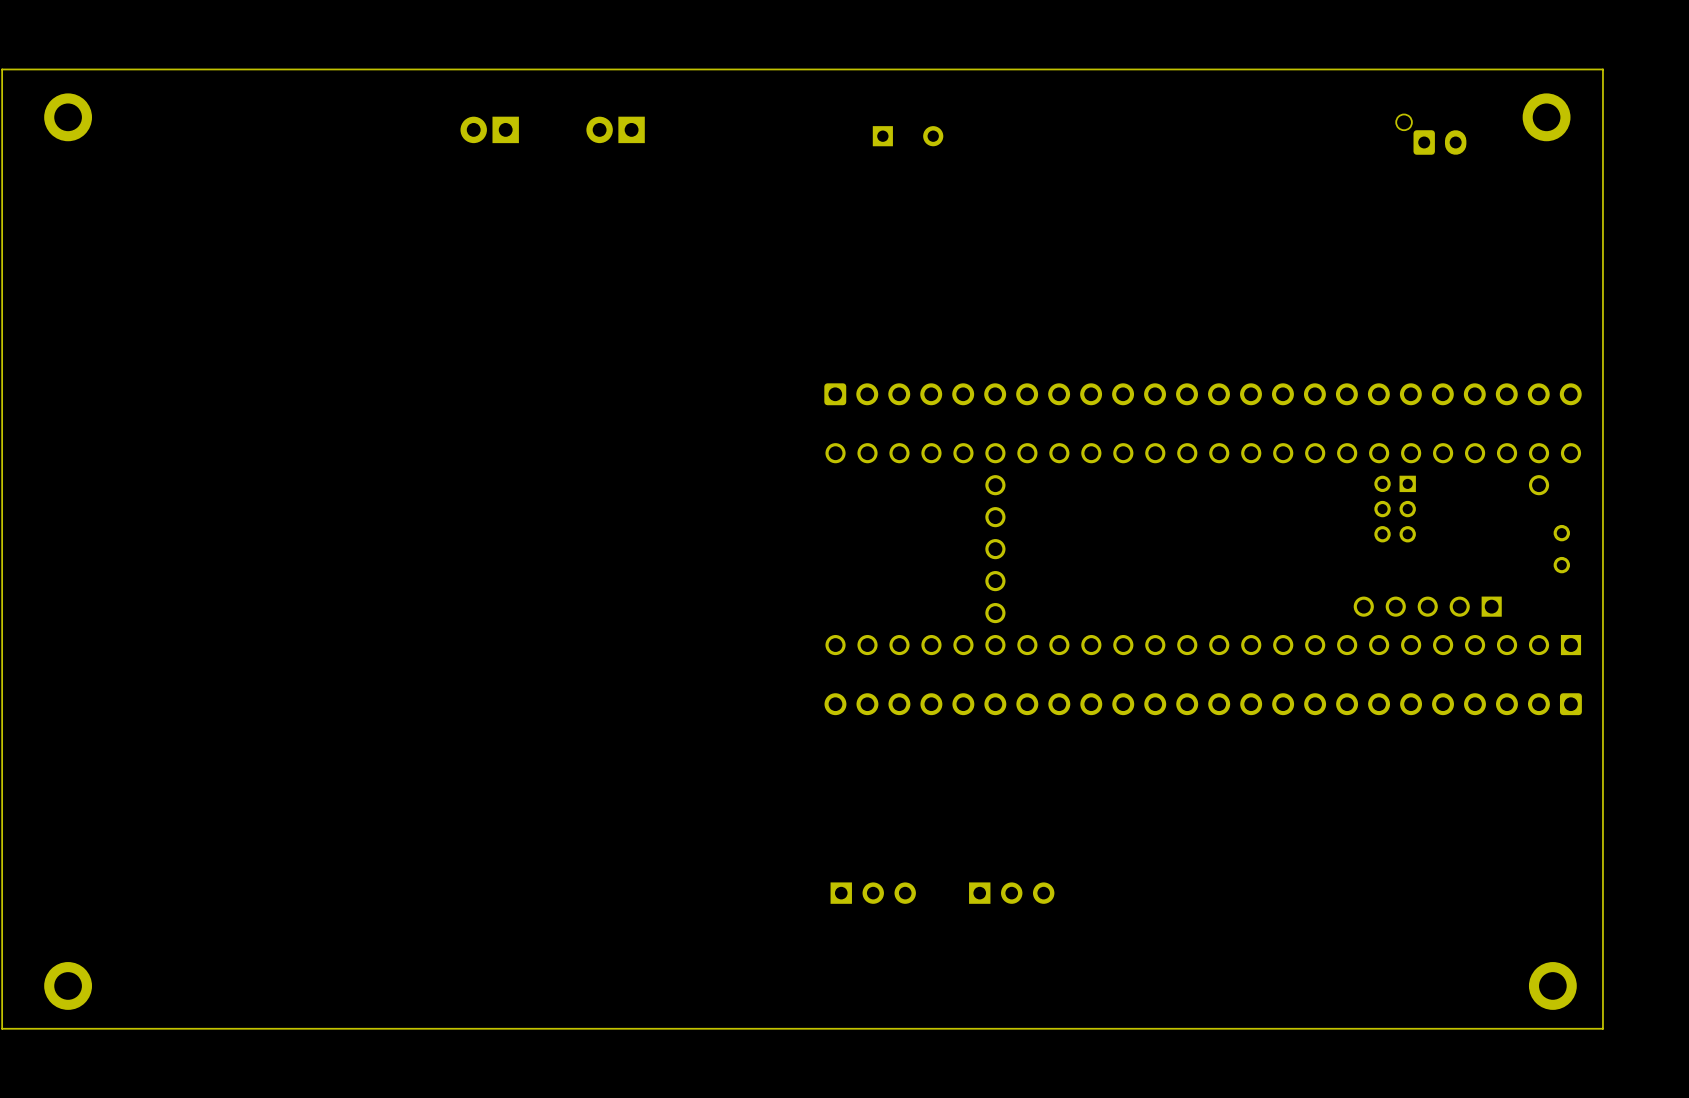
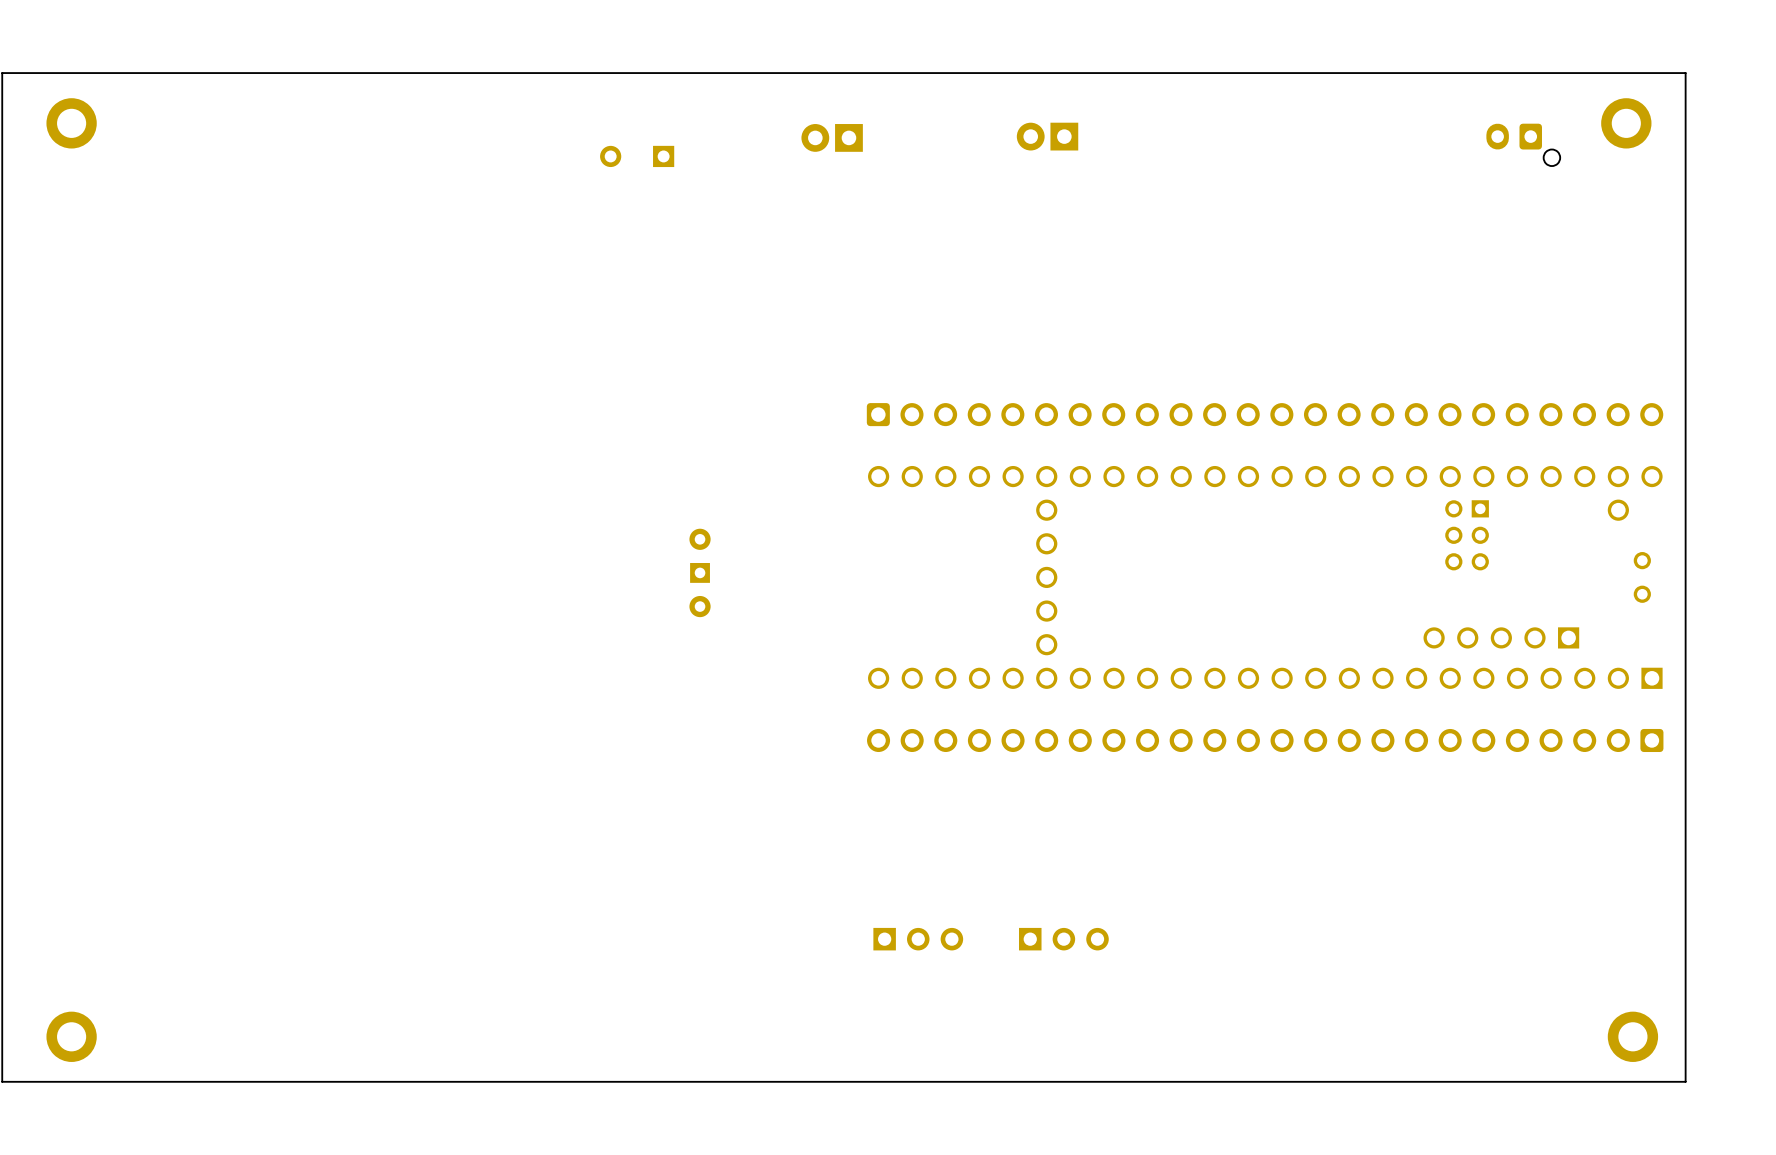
part: (489, 129) -> none
part: (615, 129) -> none
part: none -> (1047, 136)
part: none -> (832, 137)
part rotation: 0° (1431, 134) -> 180° (1523, 144)
part rotation: 0° (908, 136) -> 180° (637, 156)
part position: (908, 136) -> (637, 156)
part: none -> (700, 572)

